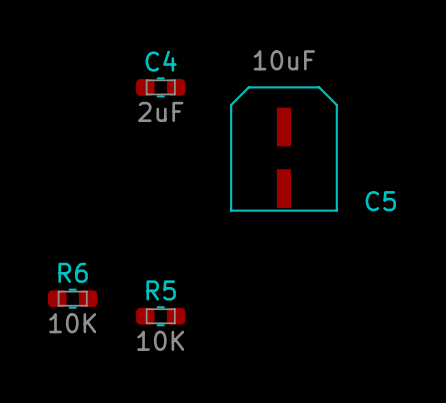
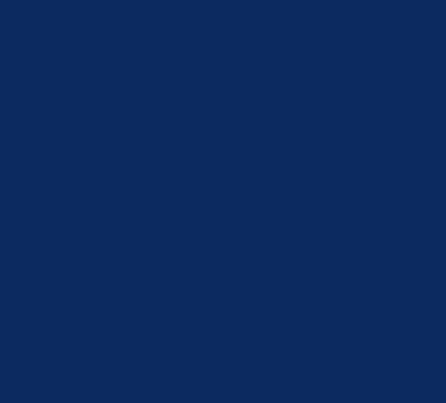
C4: 2uF (160, 87) -> none
C5: 10uF (283, 149) -> none
R6: 10K (72, 298) -> none
R5: 10K (160, 316) -> none

